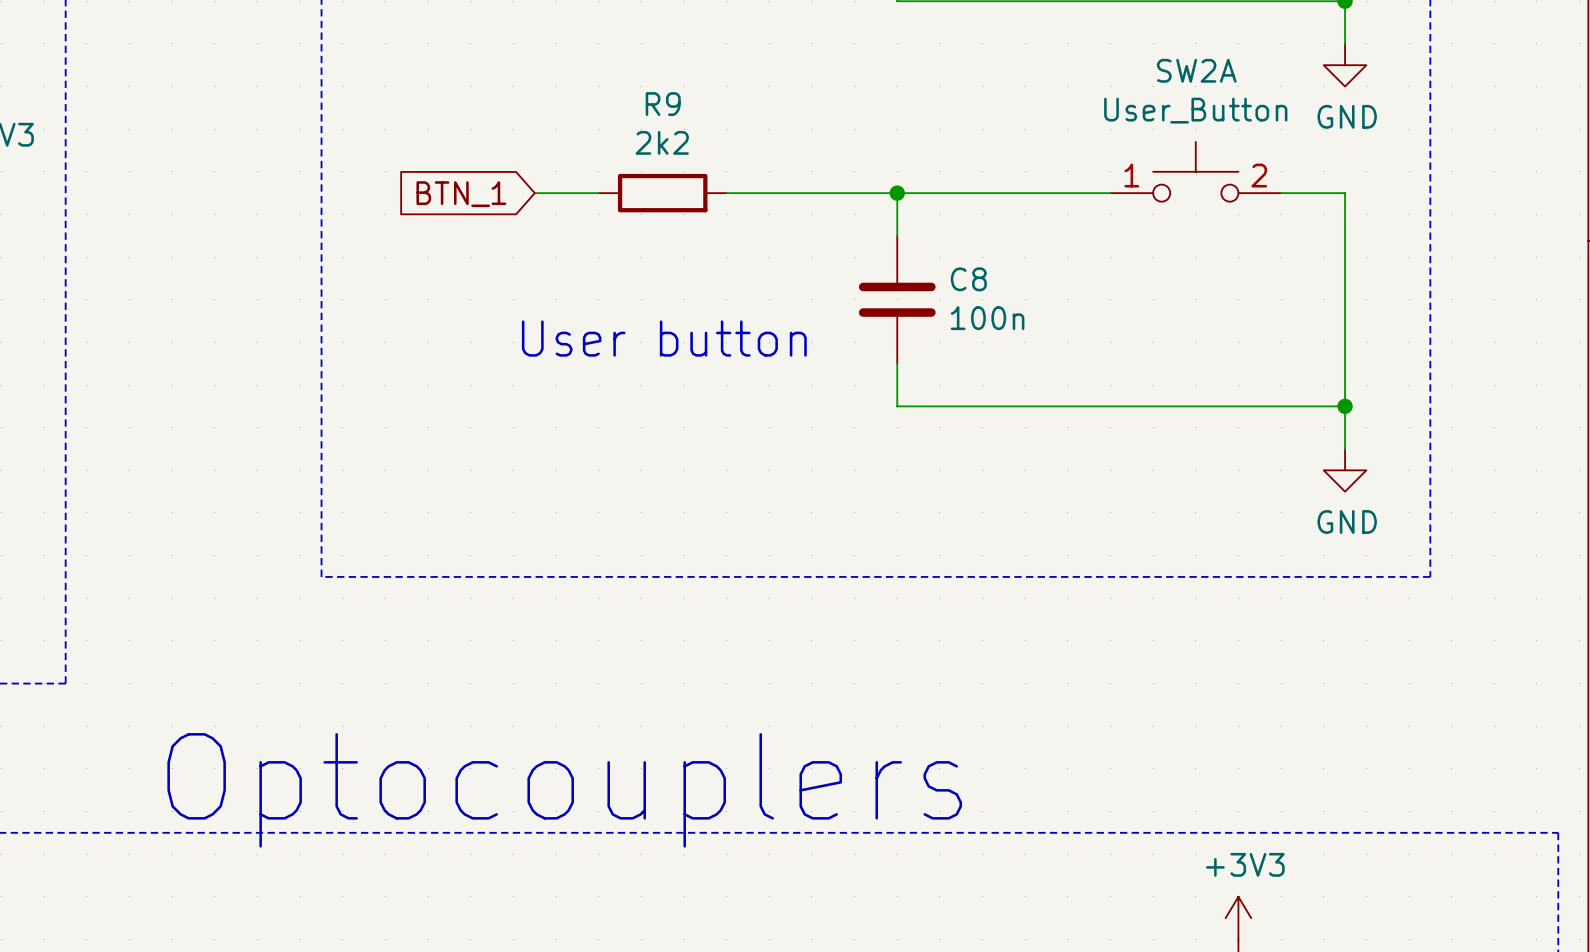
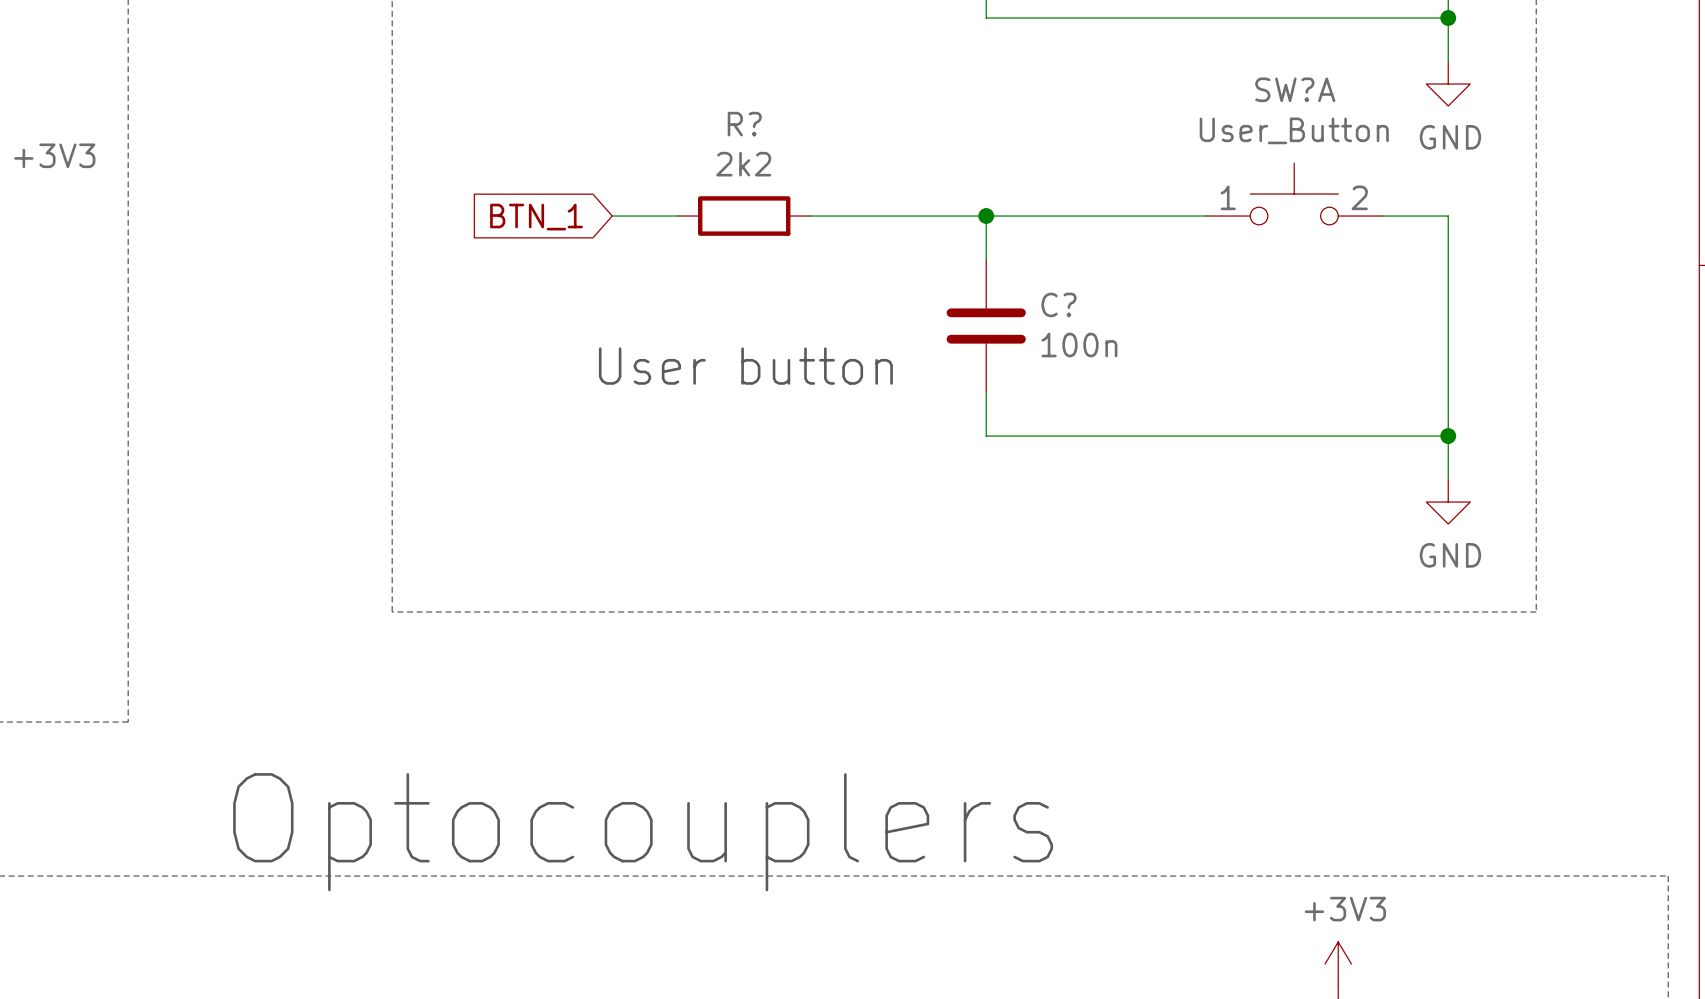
SW2A name: SW2A (1196, 70) -> SW?A (1295, 89)
R9 name: R9 (663, 104) -> R? (744, 124)
C8 name: C8 (968, 279) -> C? (1059, 304)

